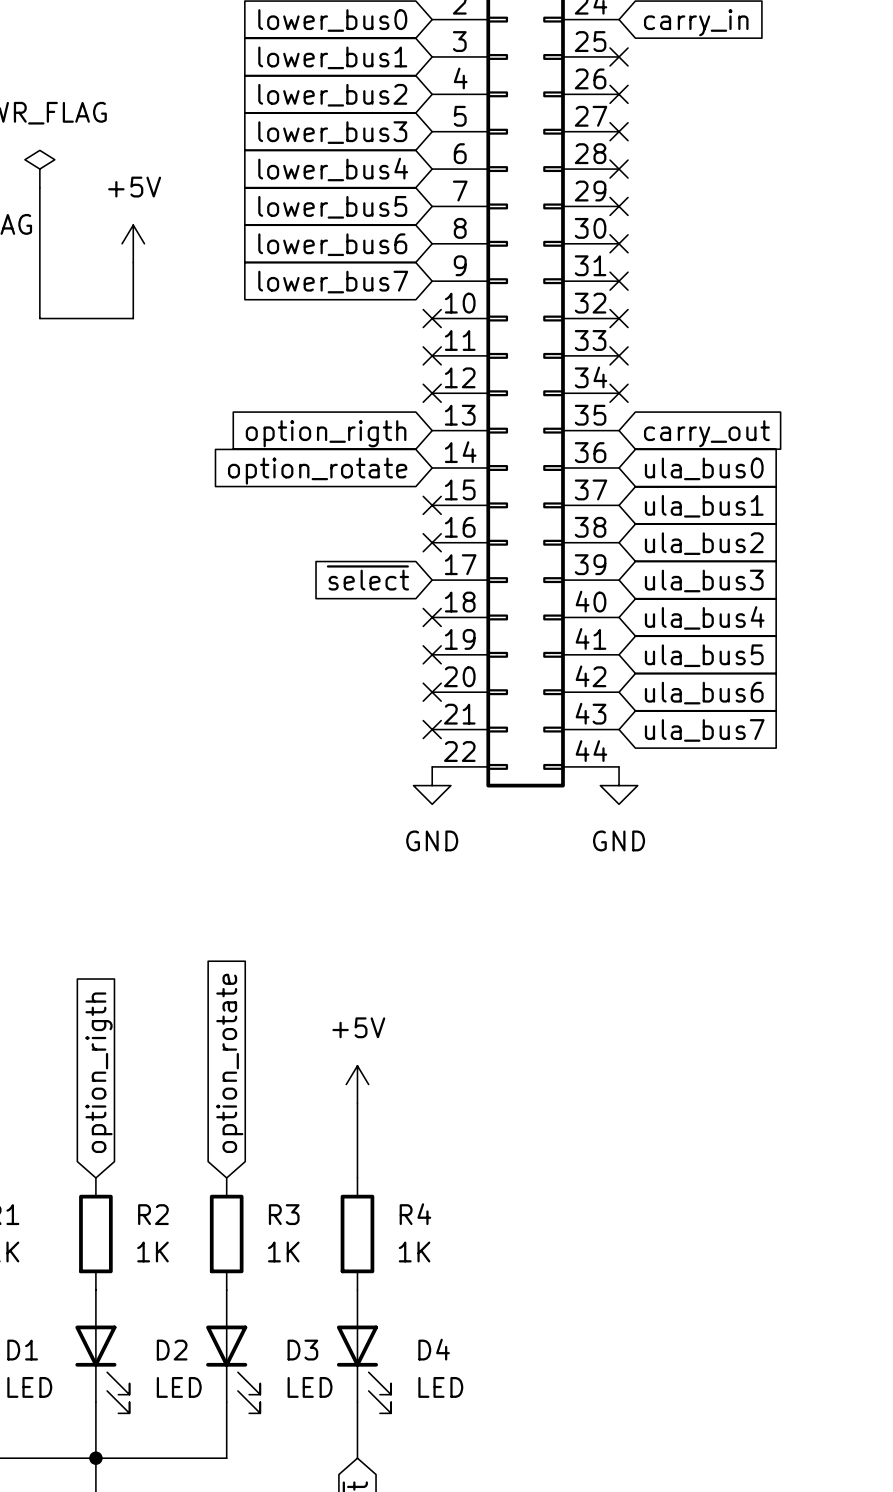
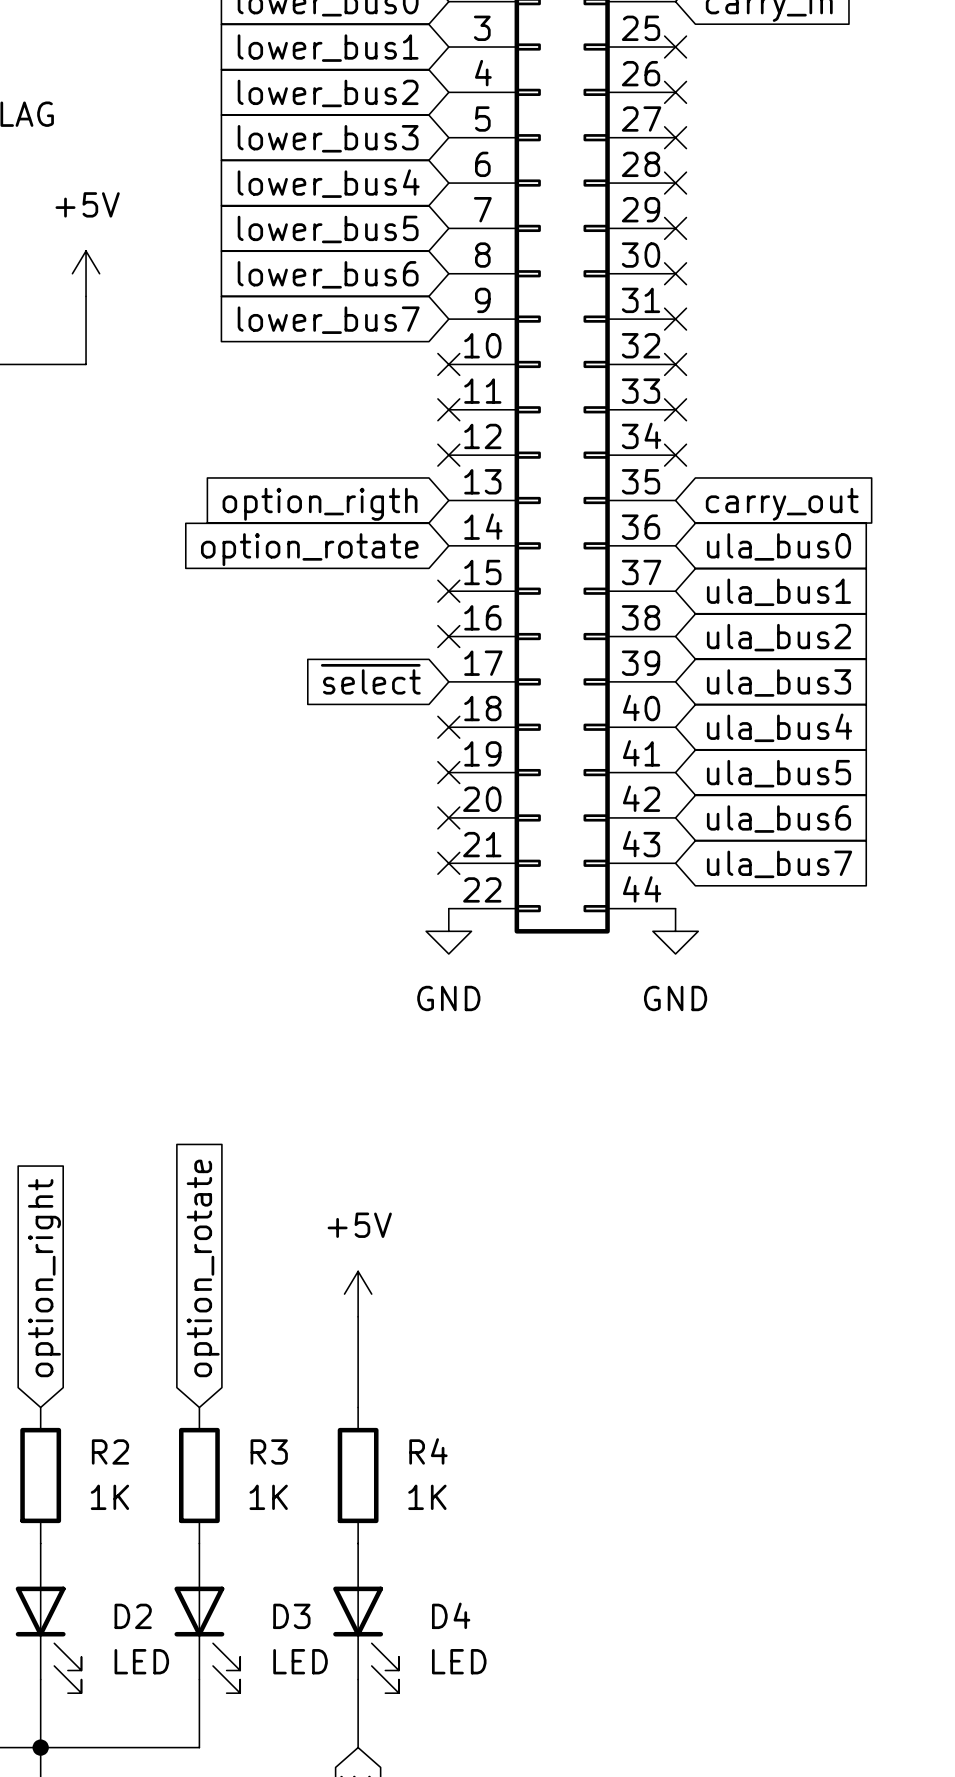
global label: option_rigth (99, 1072) -> option_right (44, 1278)

